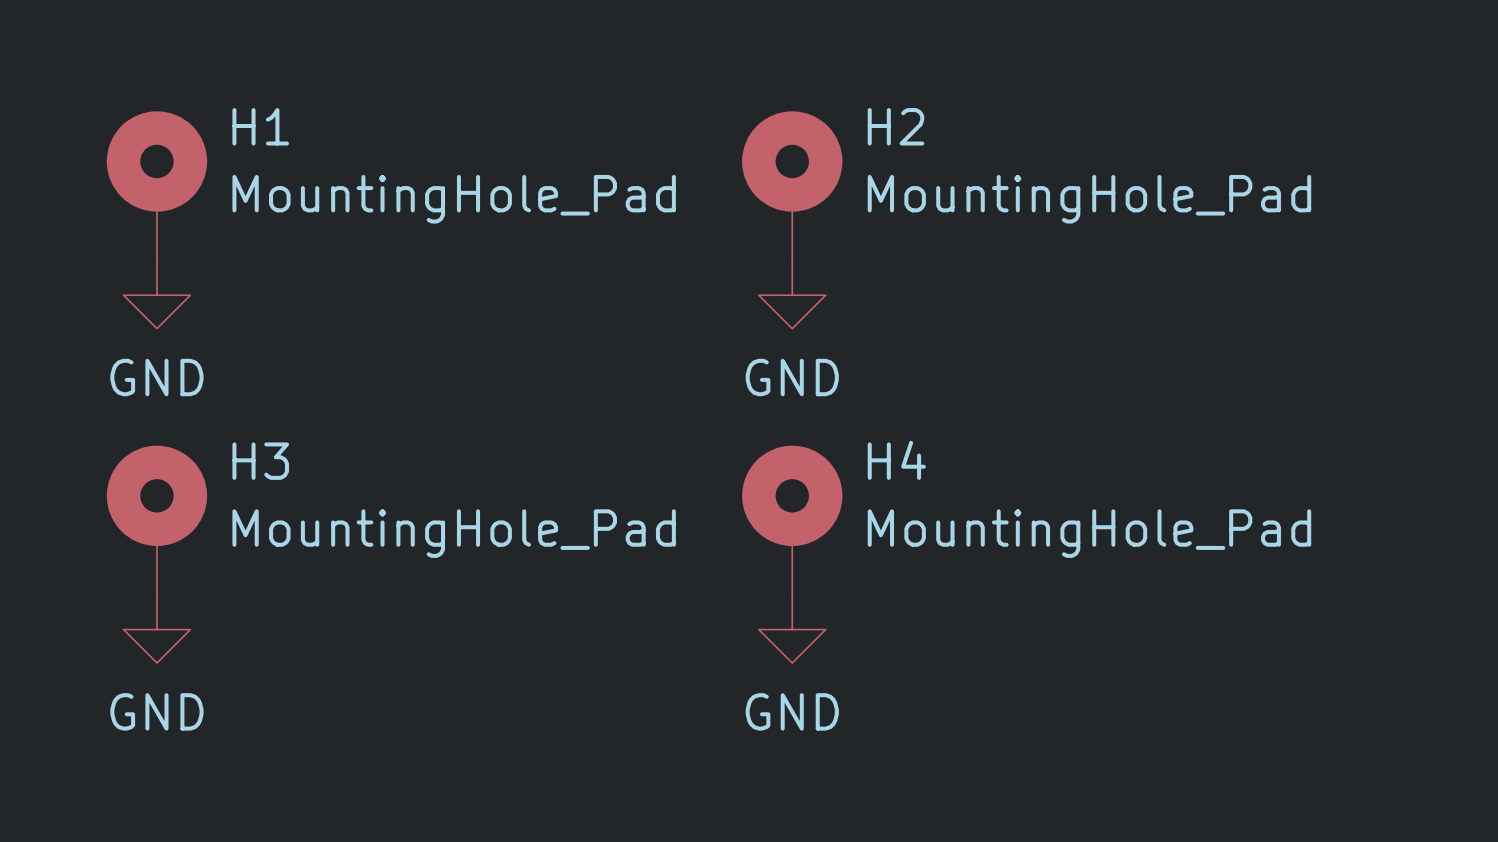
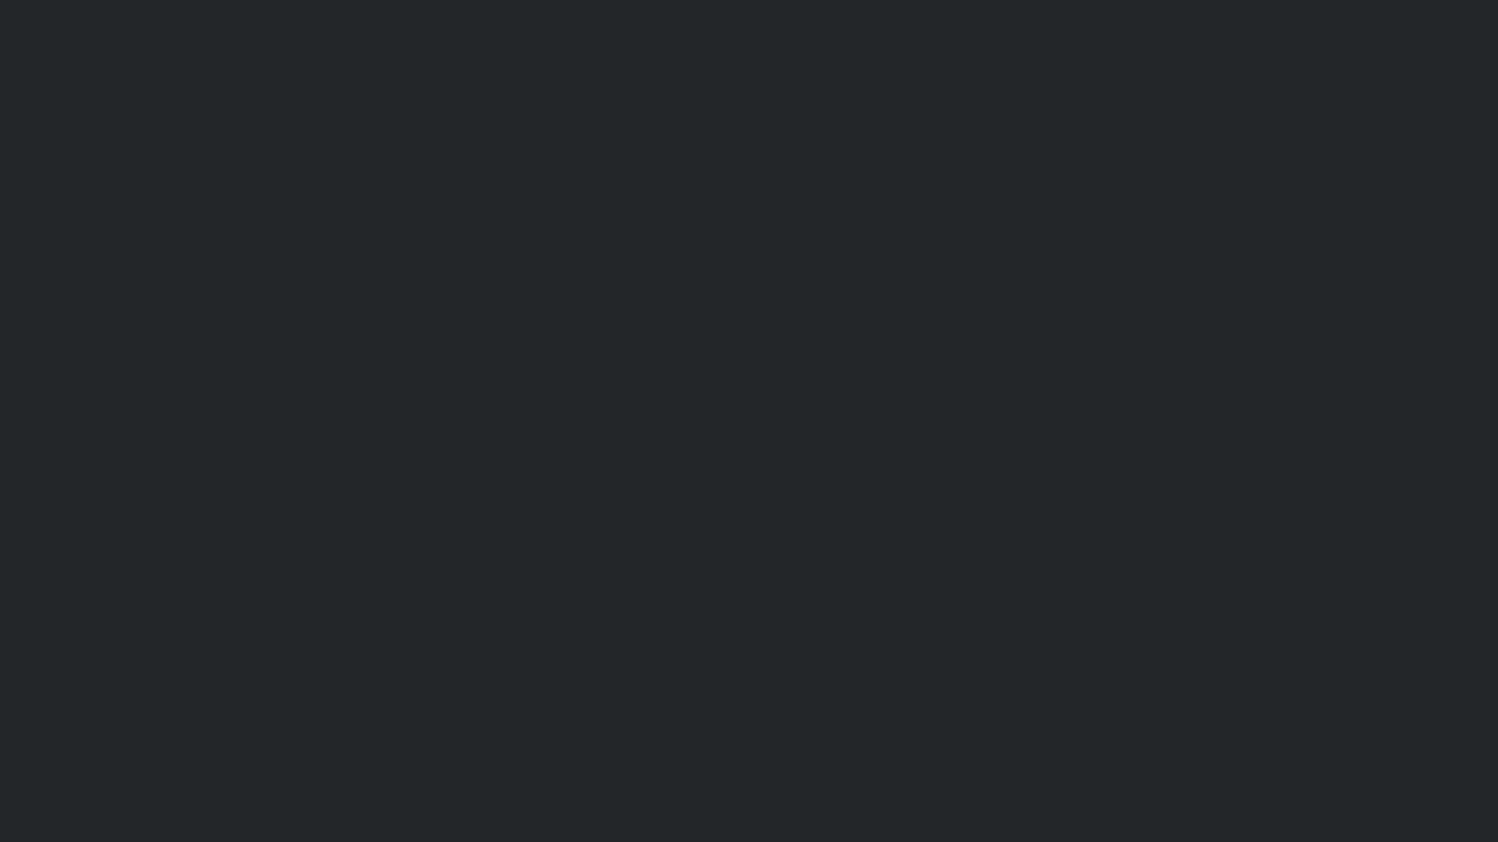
H1: MountingHole_Pad (156, 186) -> none
H2: MountingHole_Pad (792, 186) -> none
power symbol: GND (156, 295) -> none
power symbol: GND (792, 295) -> none
H3: MountingHole_Pad (156, 520) -> none
H4: MountingHole_Pad (792, 520) -> none
power symbol: GND (156, 629) -> none
power symbol: GND (792, 629) -> none

